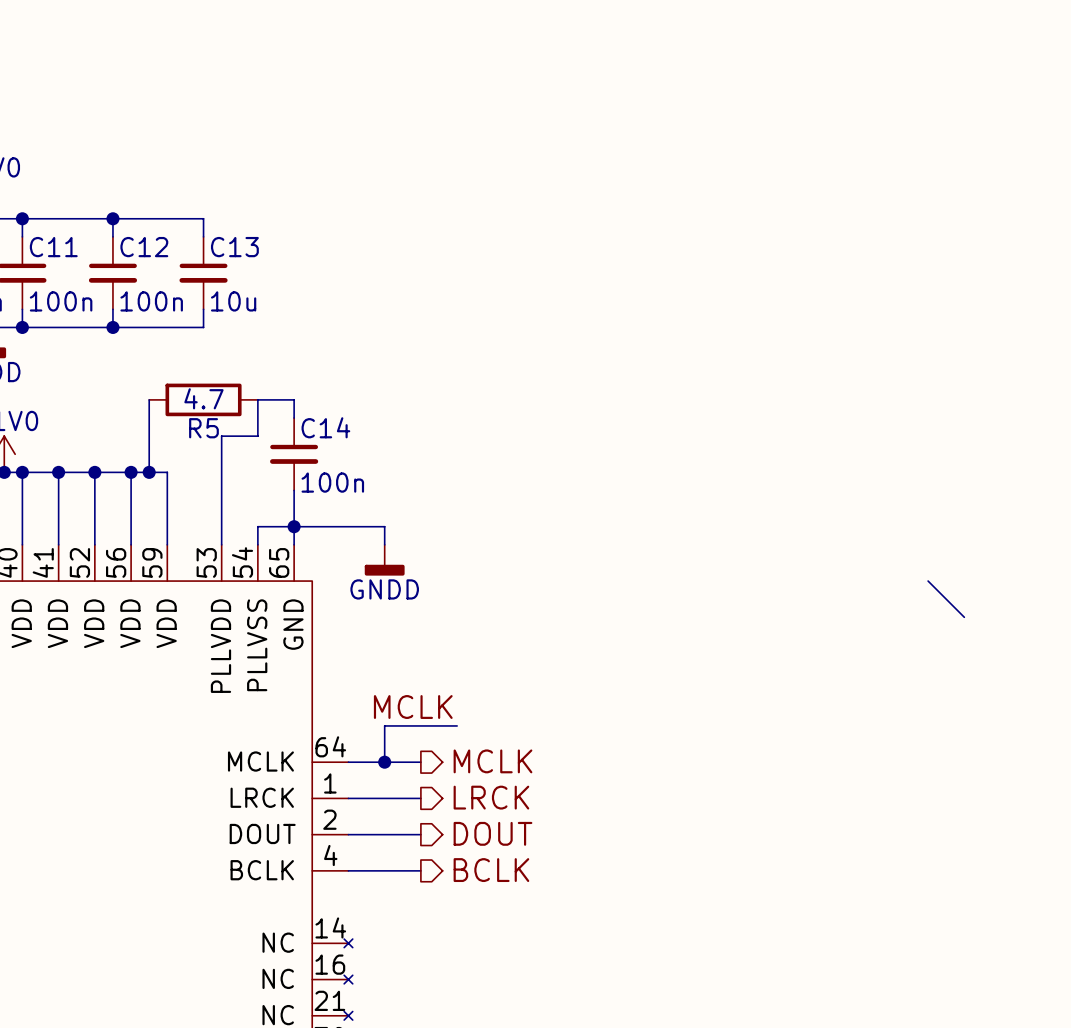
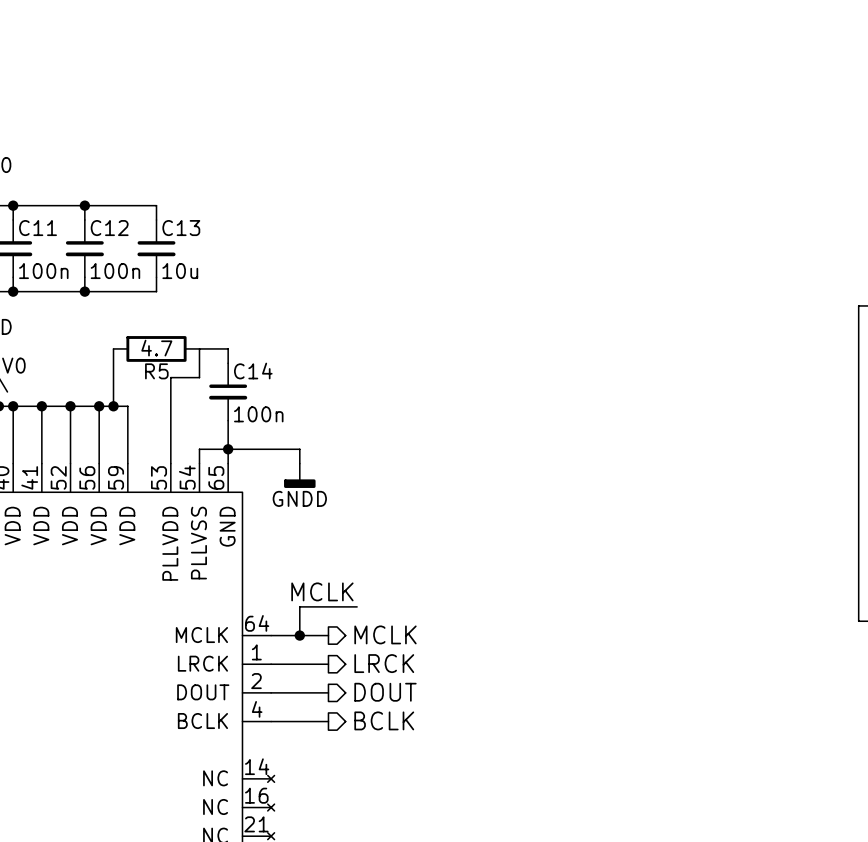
wire: (928, 581) (964, 617) -> none

